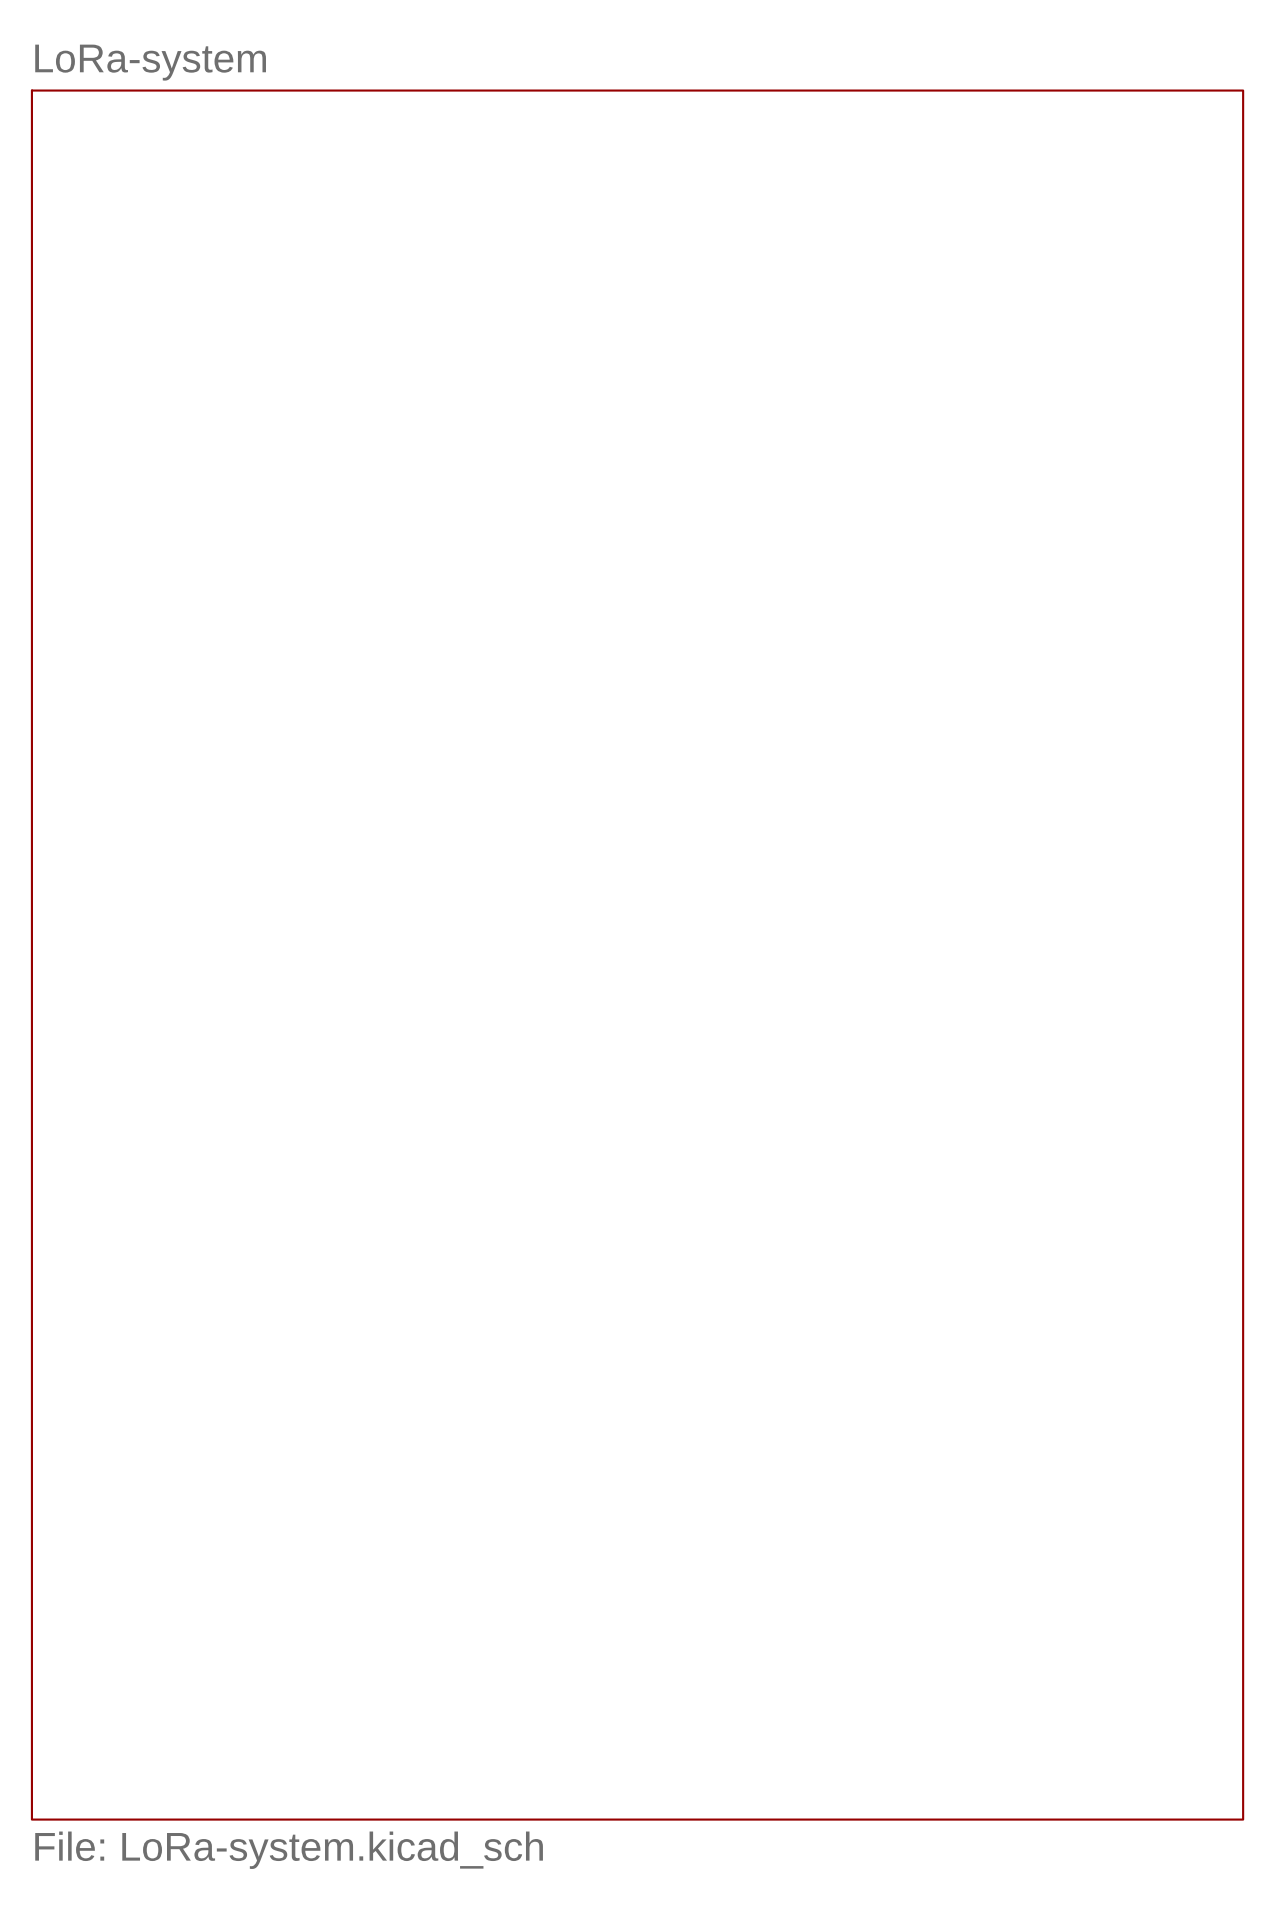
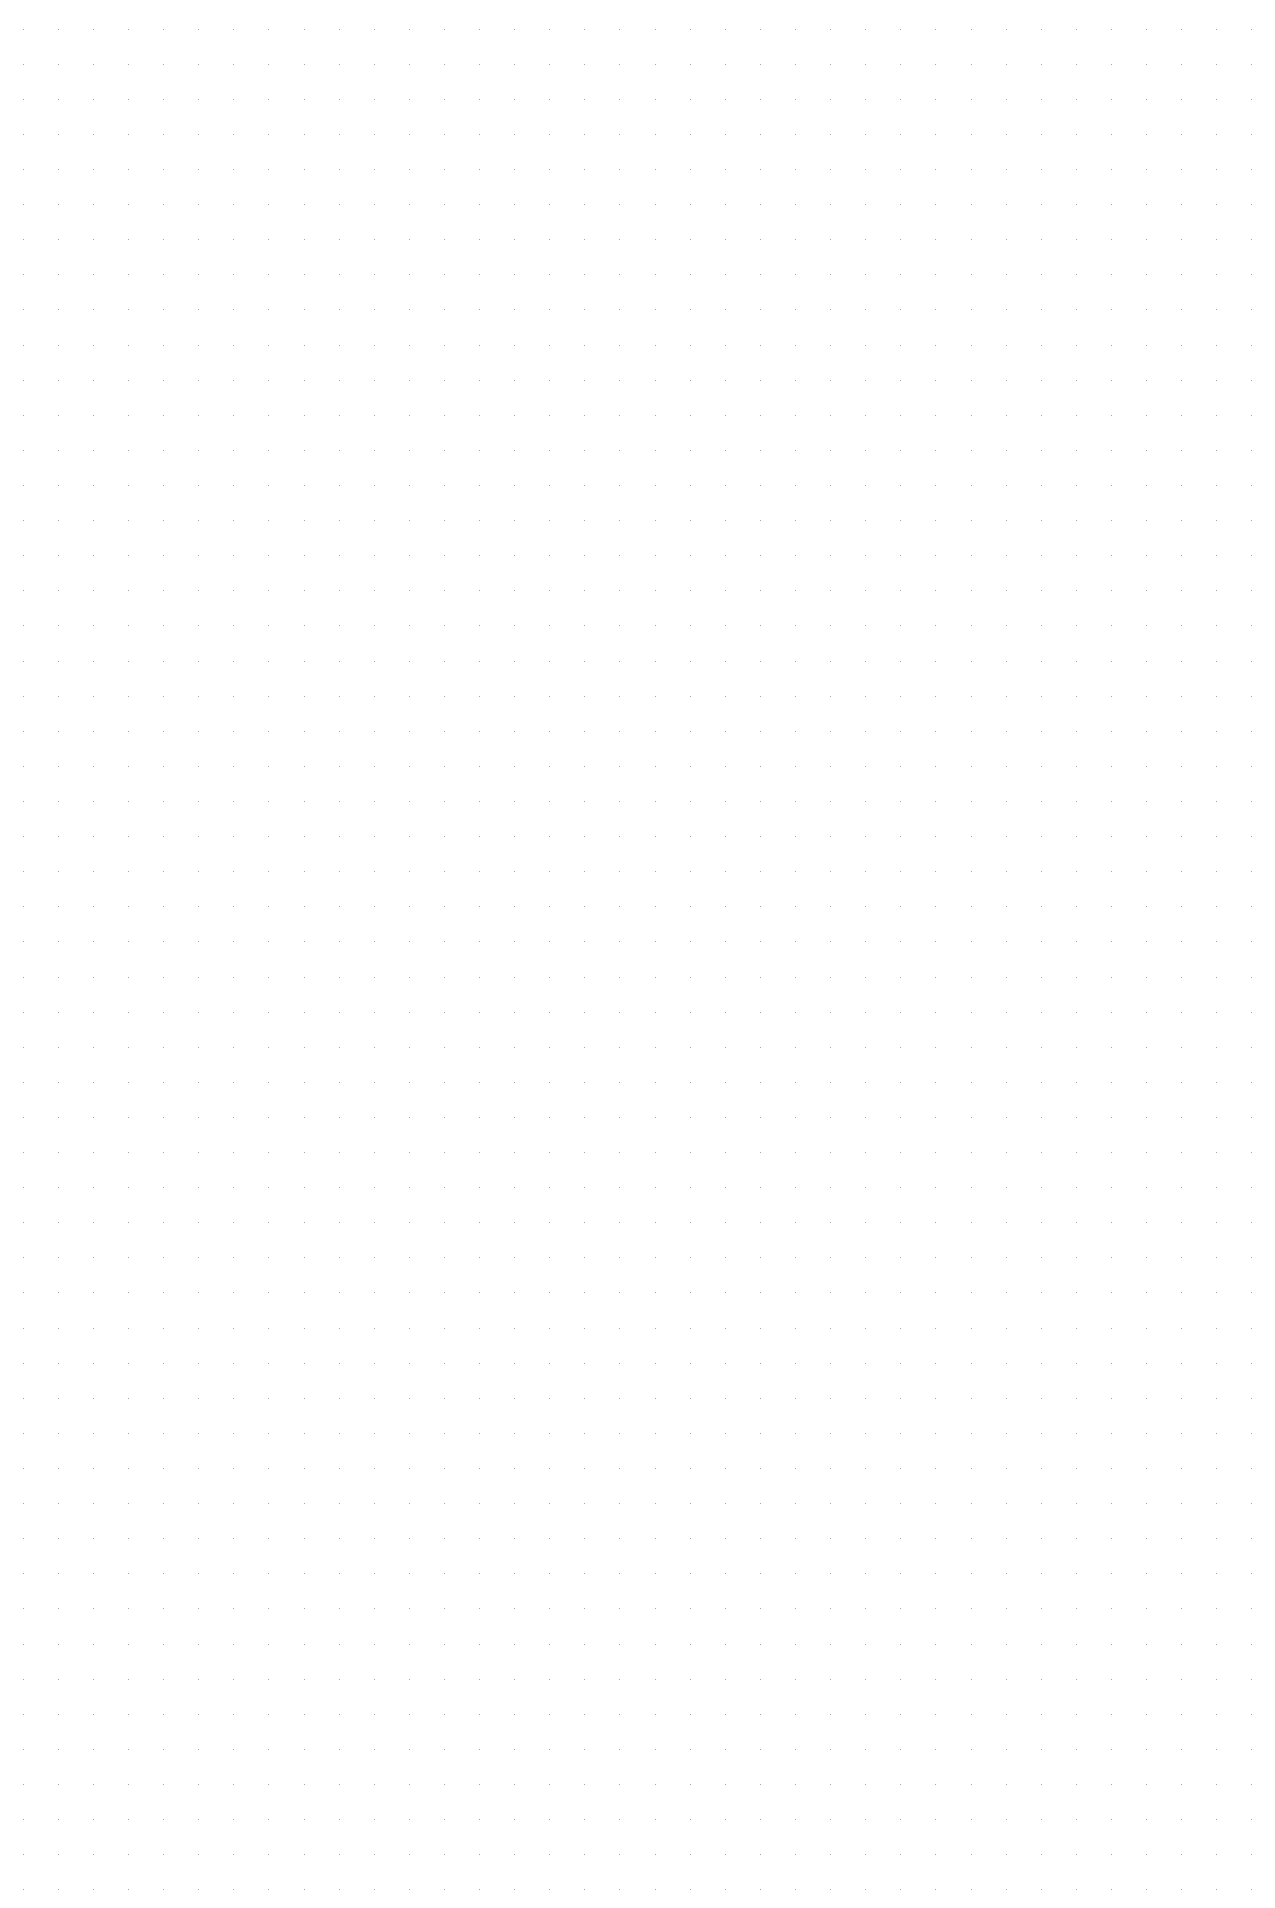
sheet LoRa-system: File: LoRa-system.kicad_sch (637, 955) -> none

